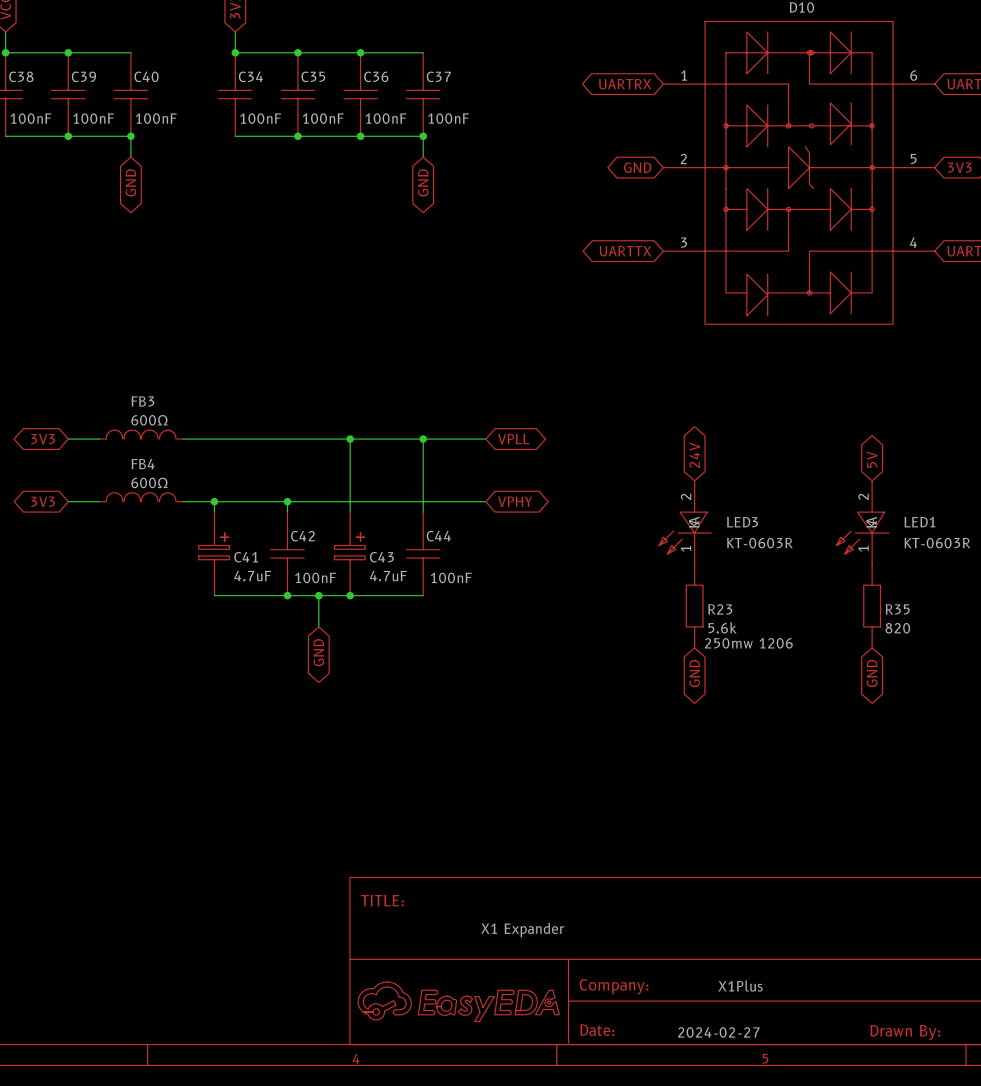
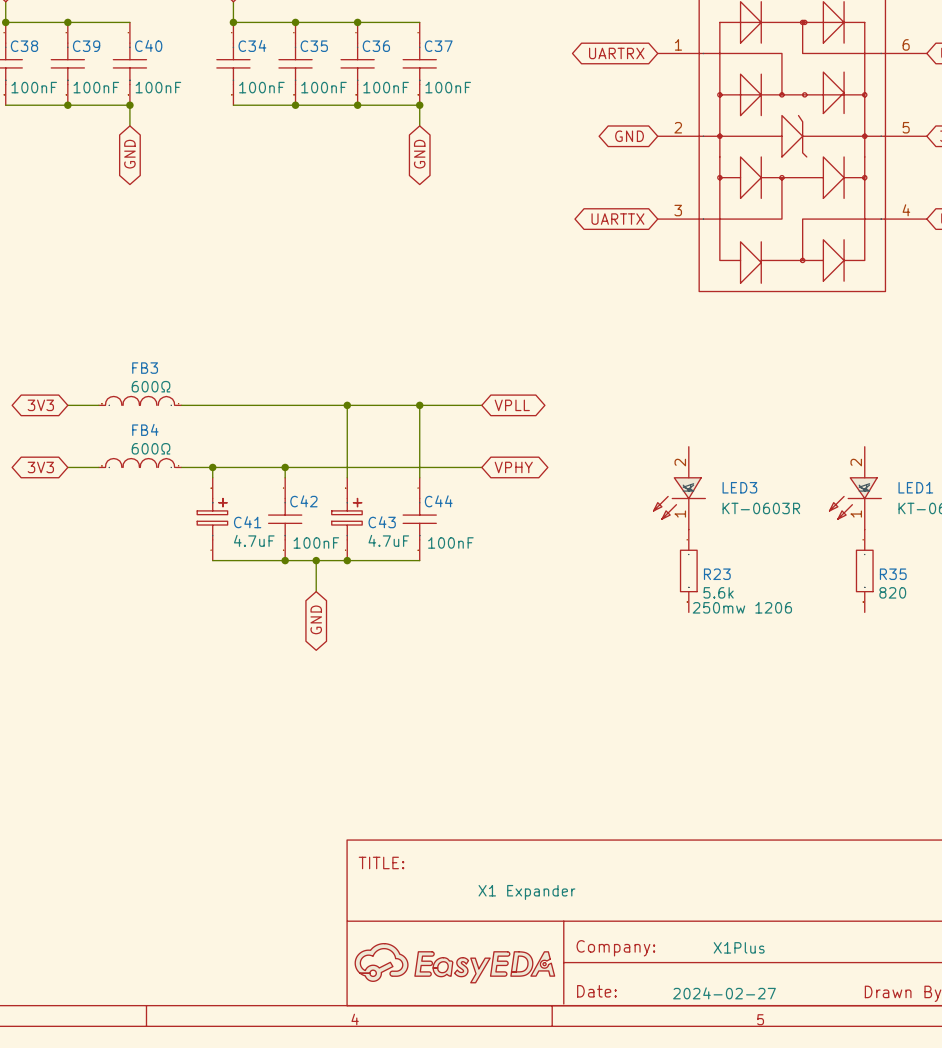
global label: 24V (694, 455) -> none
global label: 5V (872, 459) -> none
global label: GND (694, 673) -> none
global label: GND (872, 673) -> none

